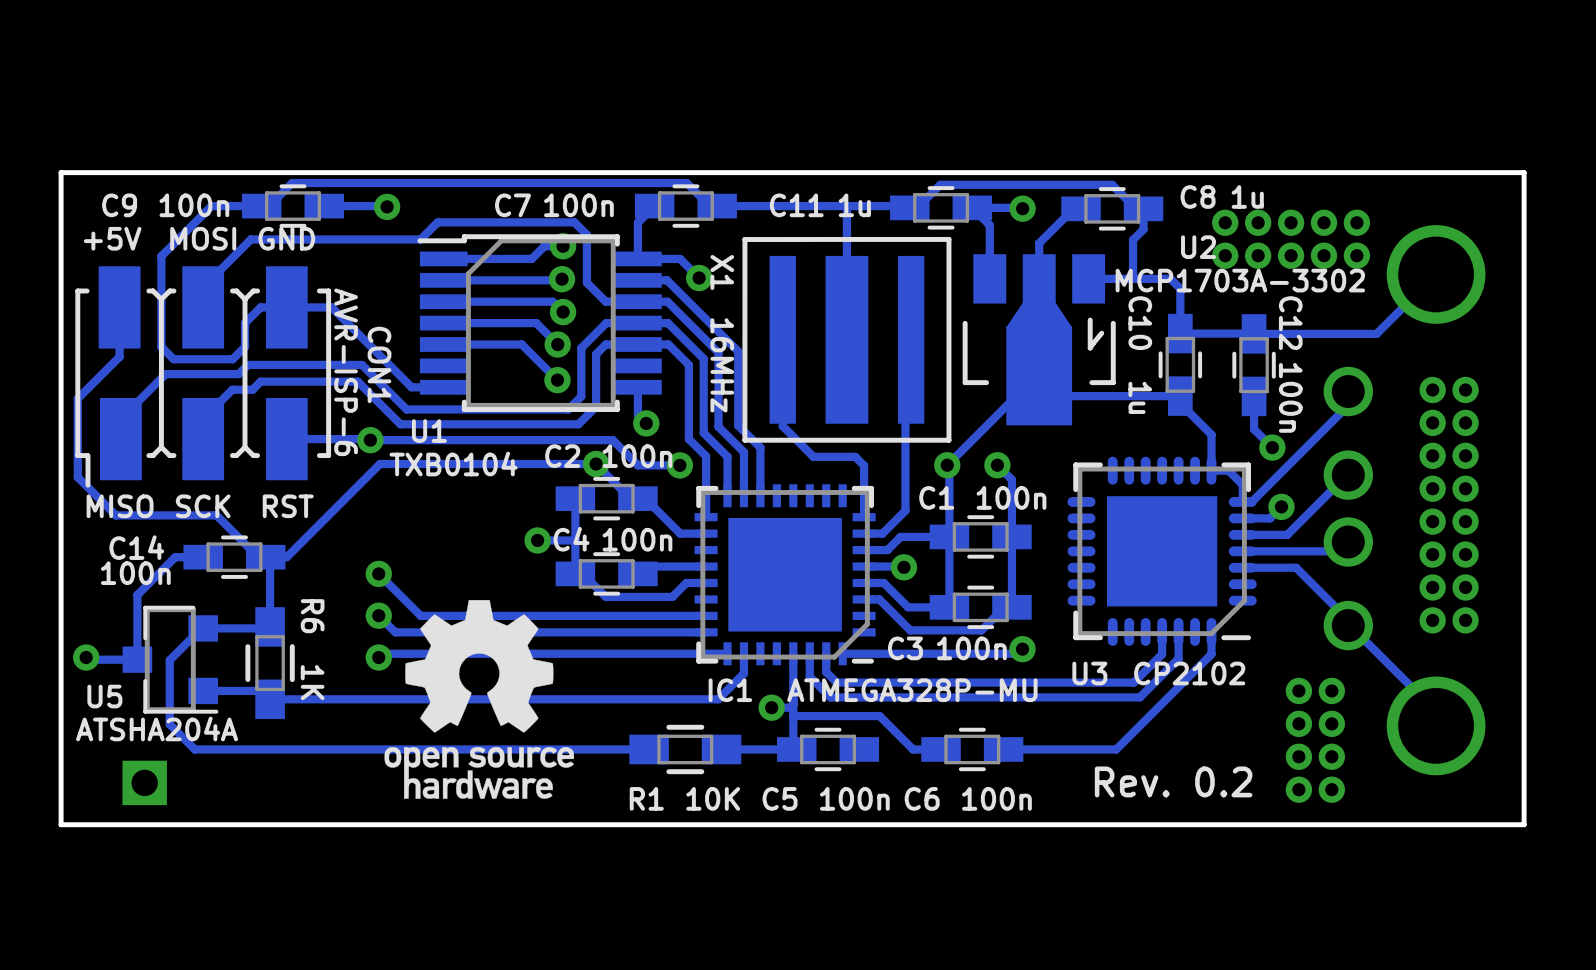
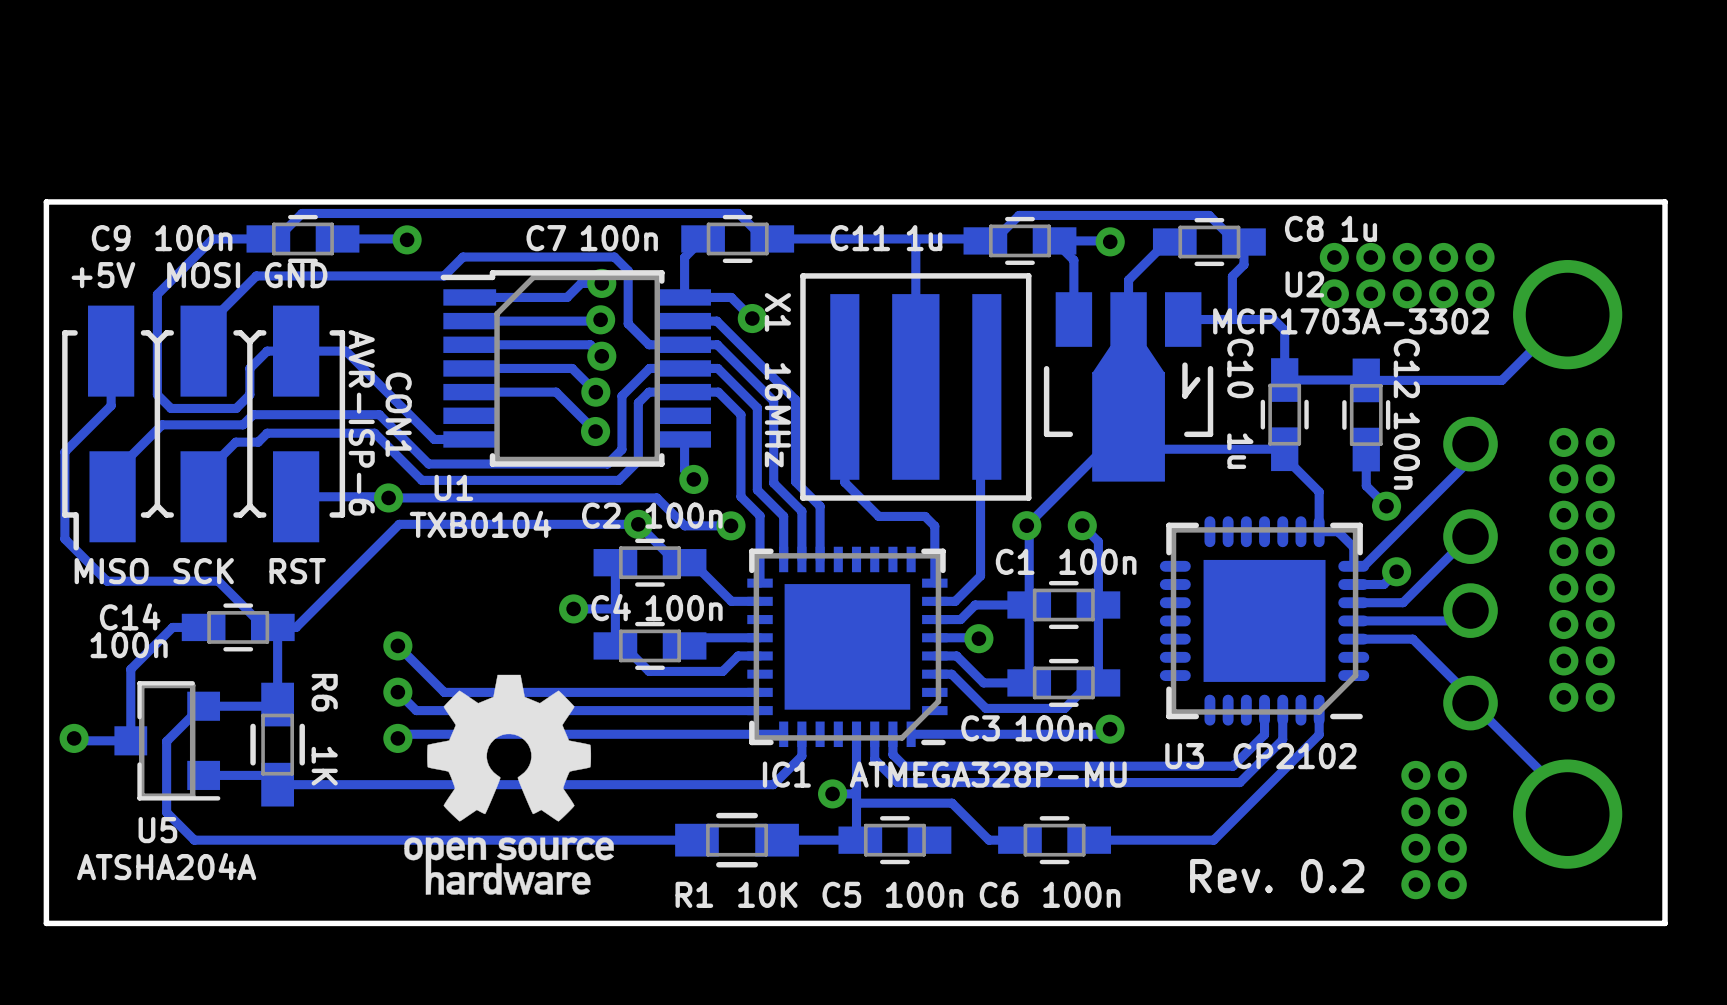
U5 name position: U5 (104, 696) -> U5 (157, 830)
U5 value position: ATSHA204A (157, 728) -> ATSHA204A (166, 866)
part: (144, 782) -> none

